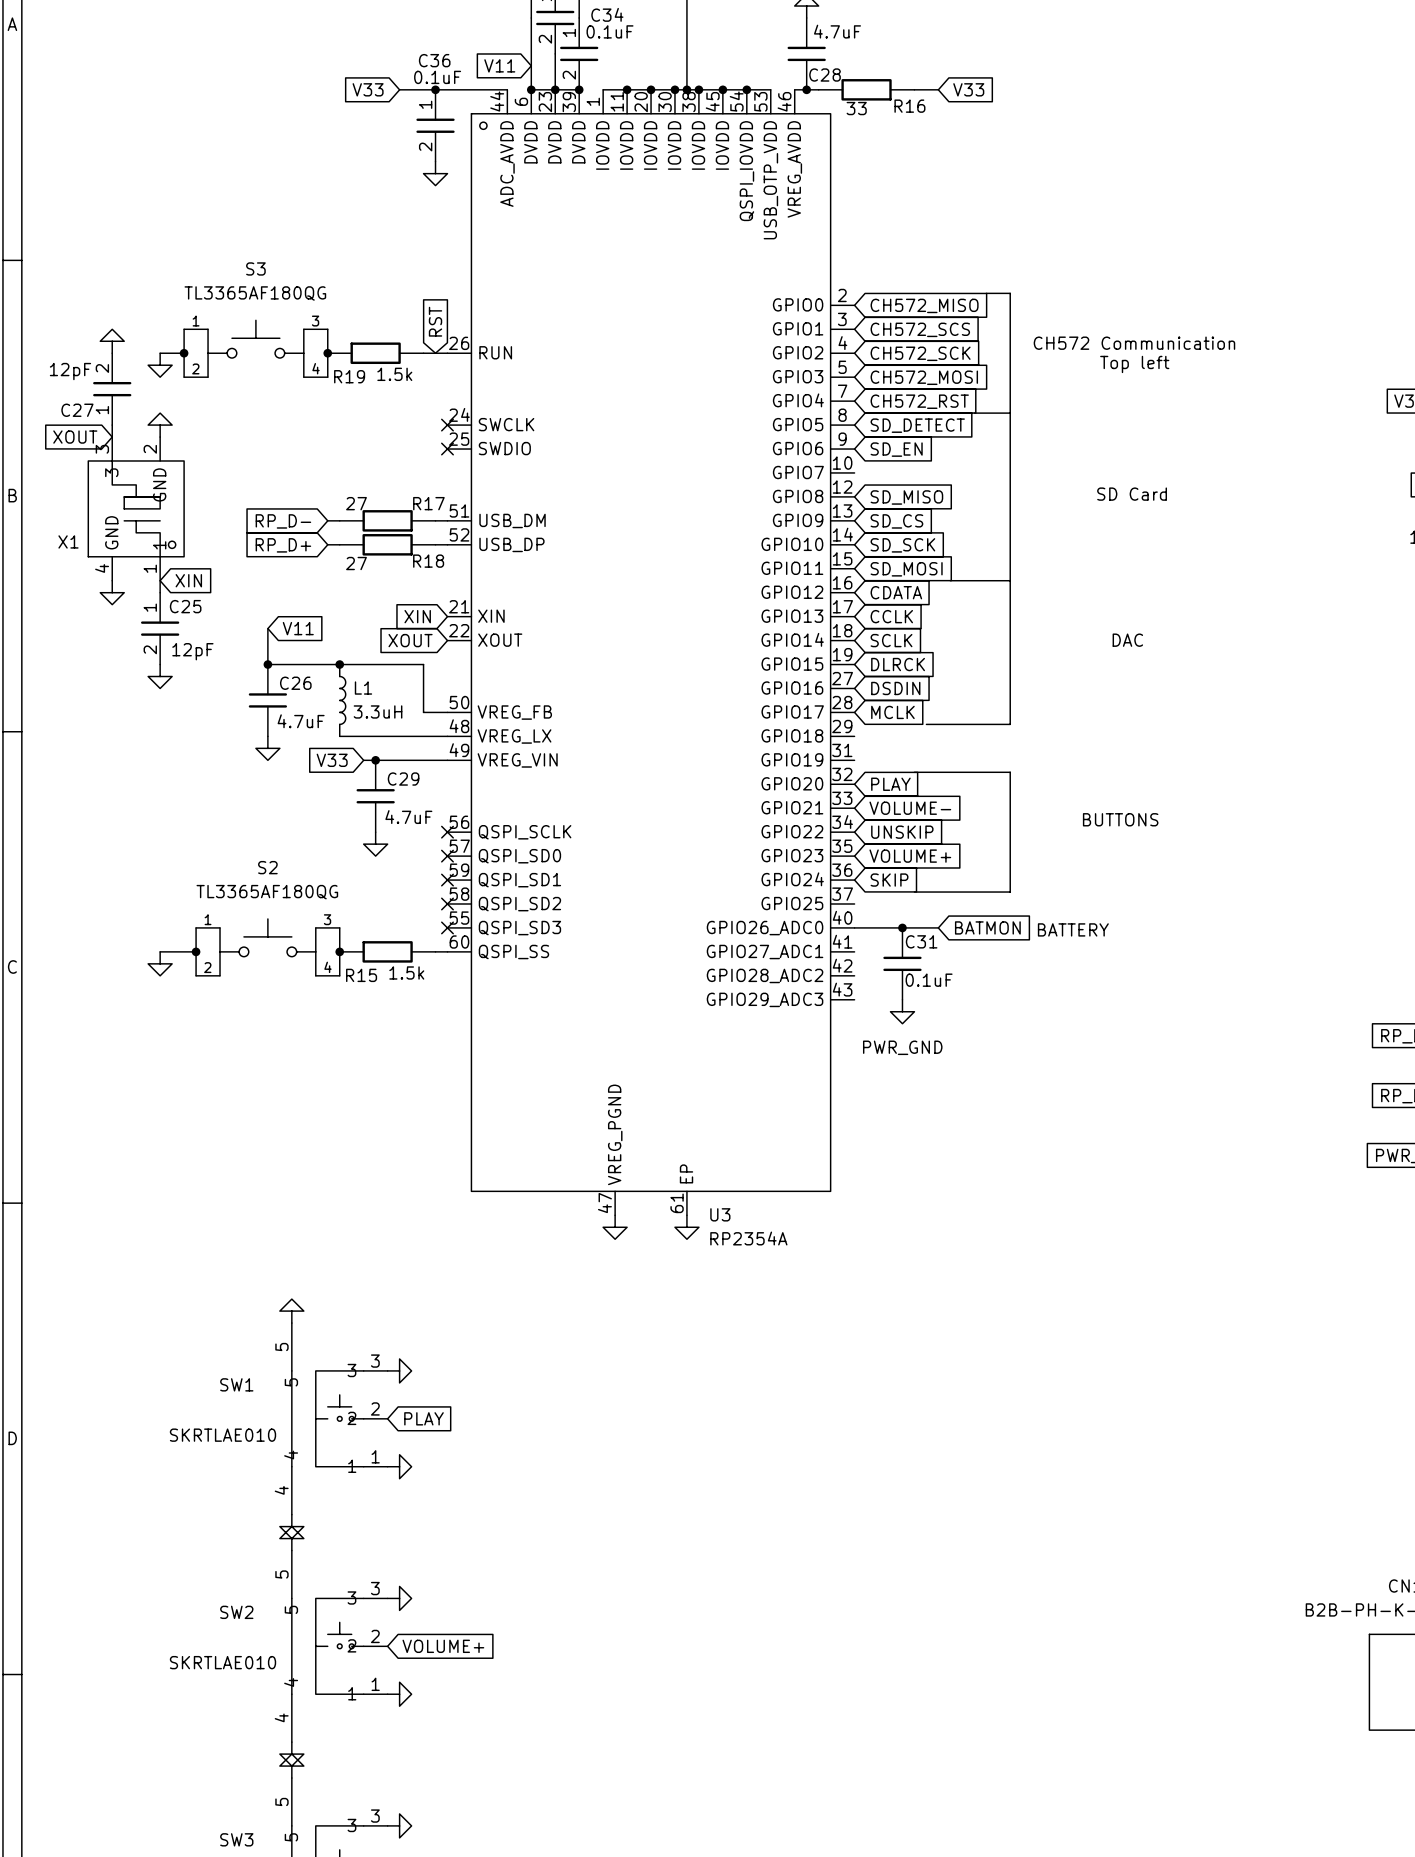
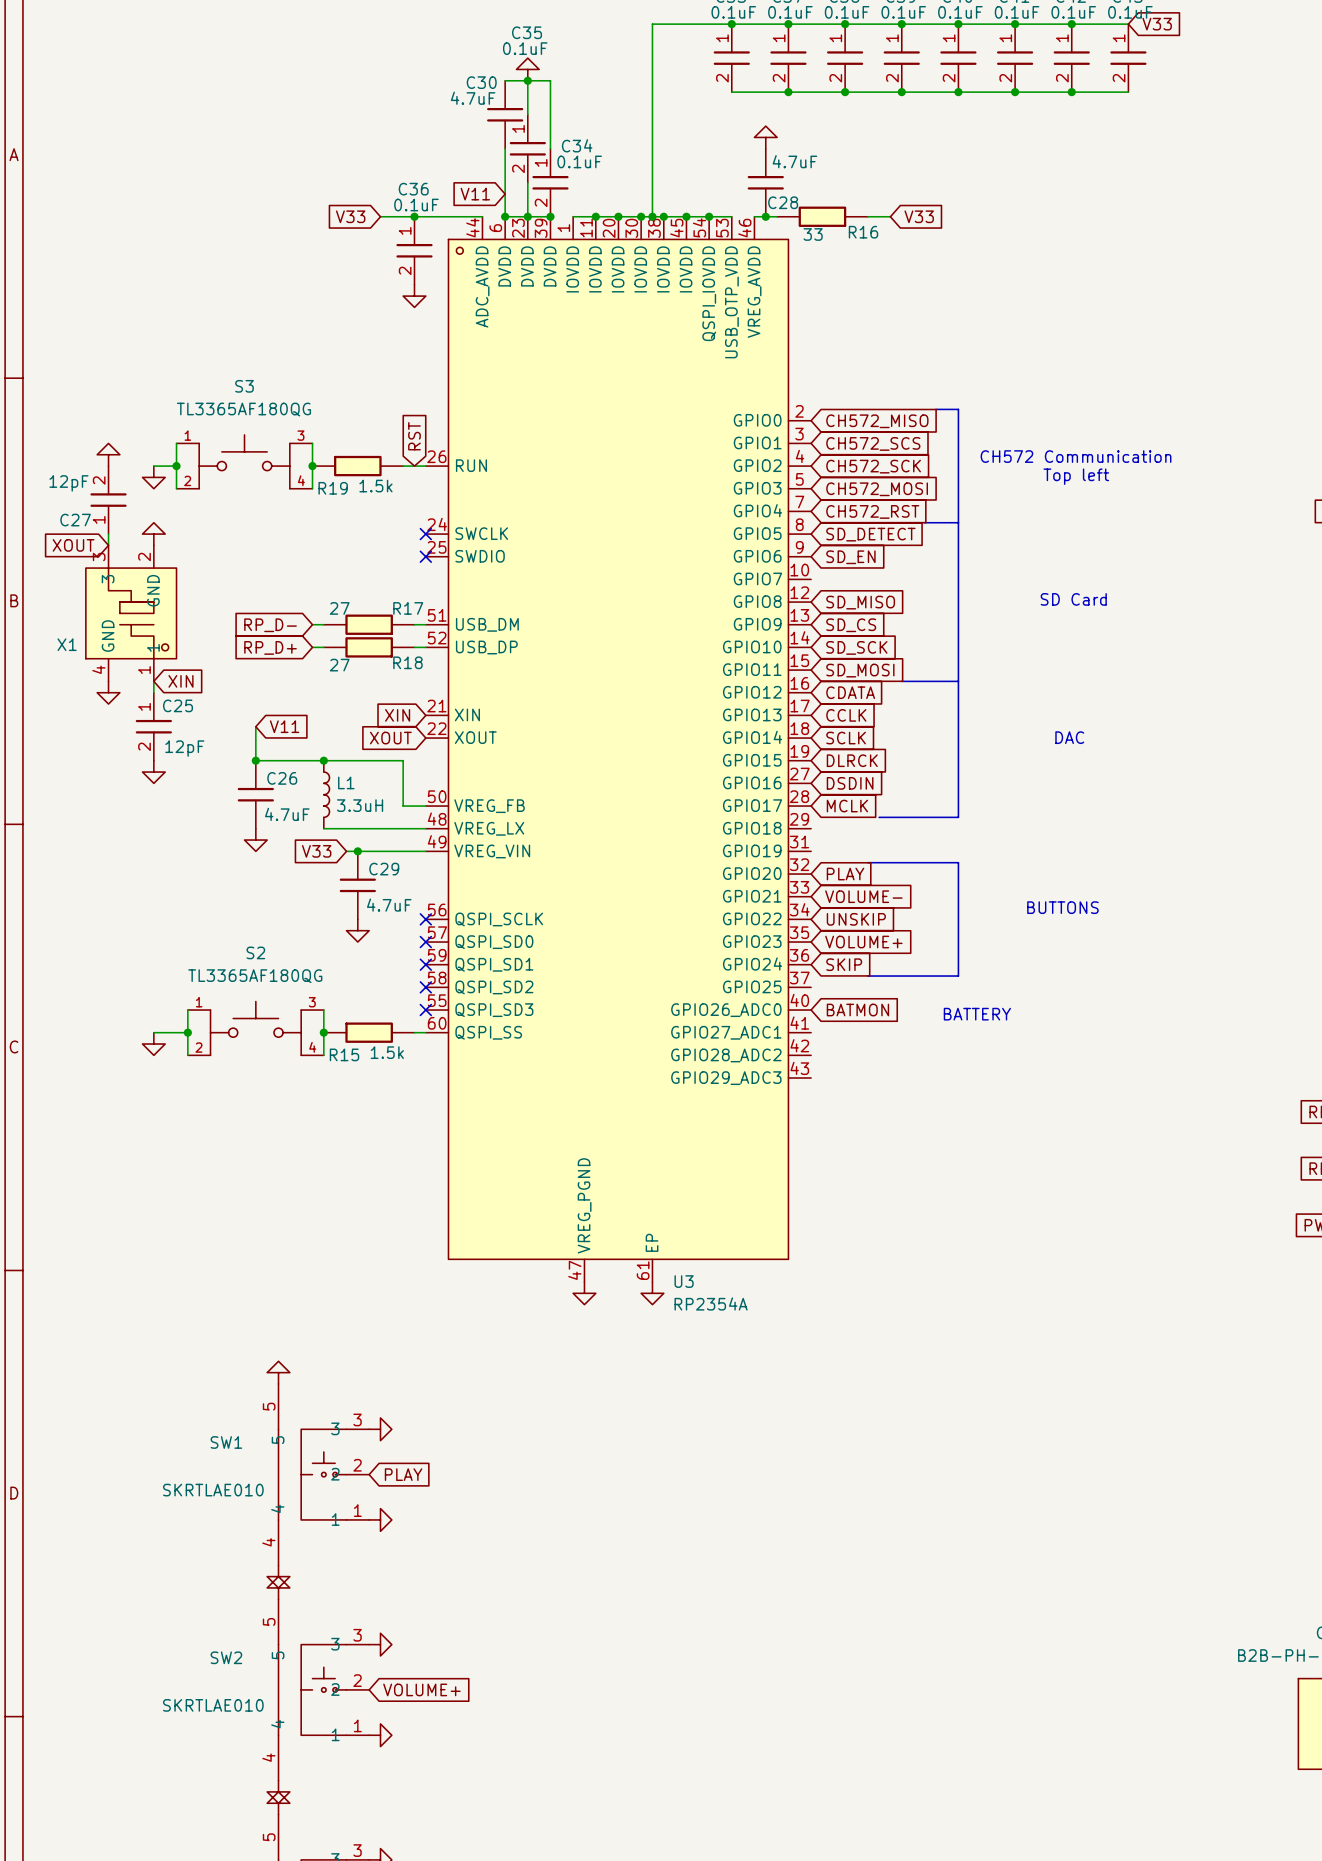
wire: (854, 927) (938, 927) -> none
junction: (902, 927) -> none
global label position: BATMON (987, 927) -> BATMON (857, 1010)
text position: BATTERY (1073, 929) -> BATTERY (977, 1014)
C31: 0.1uF (902, 963) -> none
power symbol: PWR_GND (902, 1011) -> none

